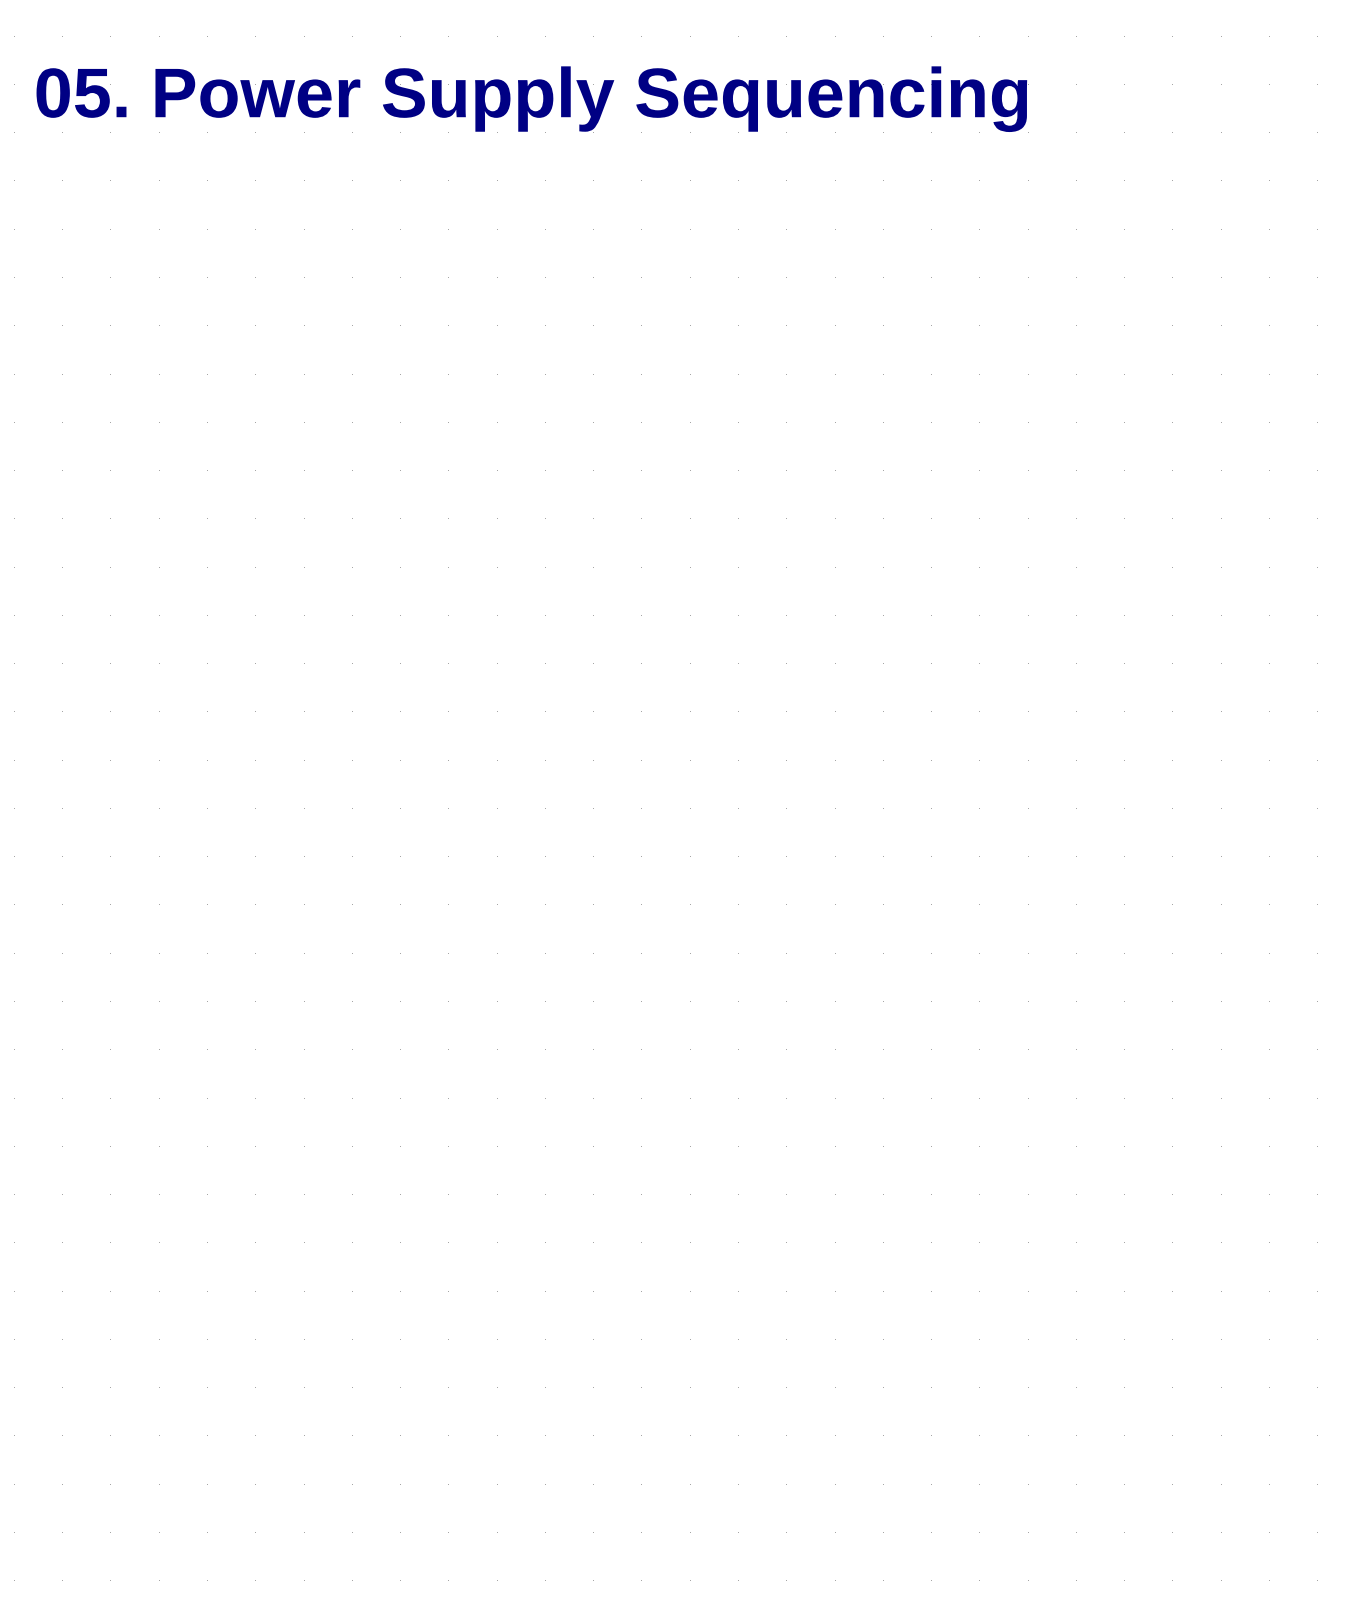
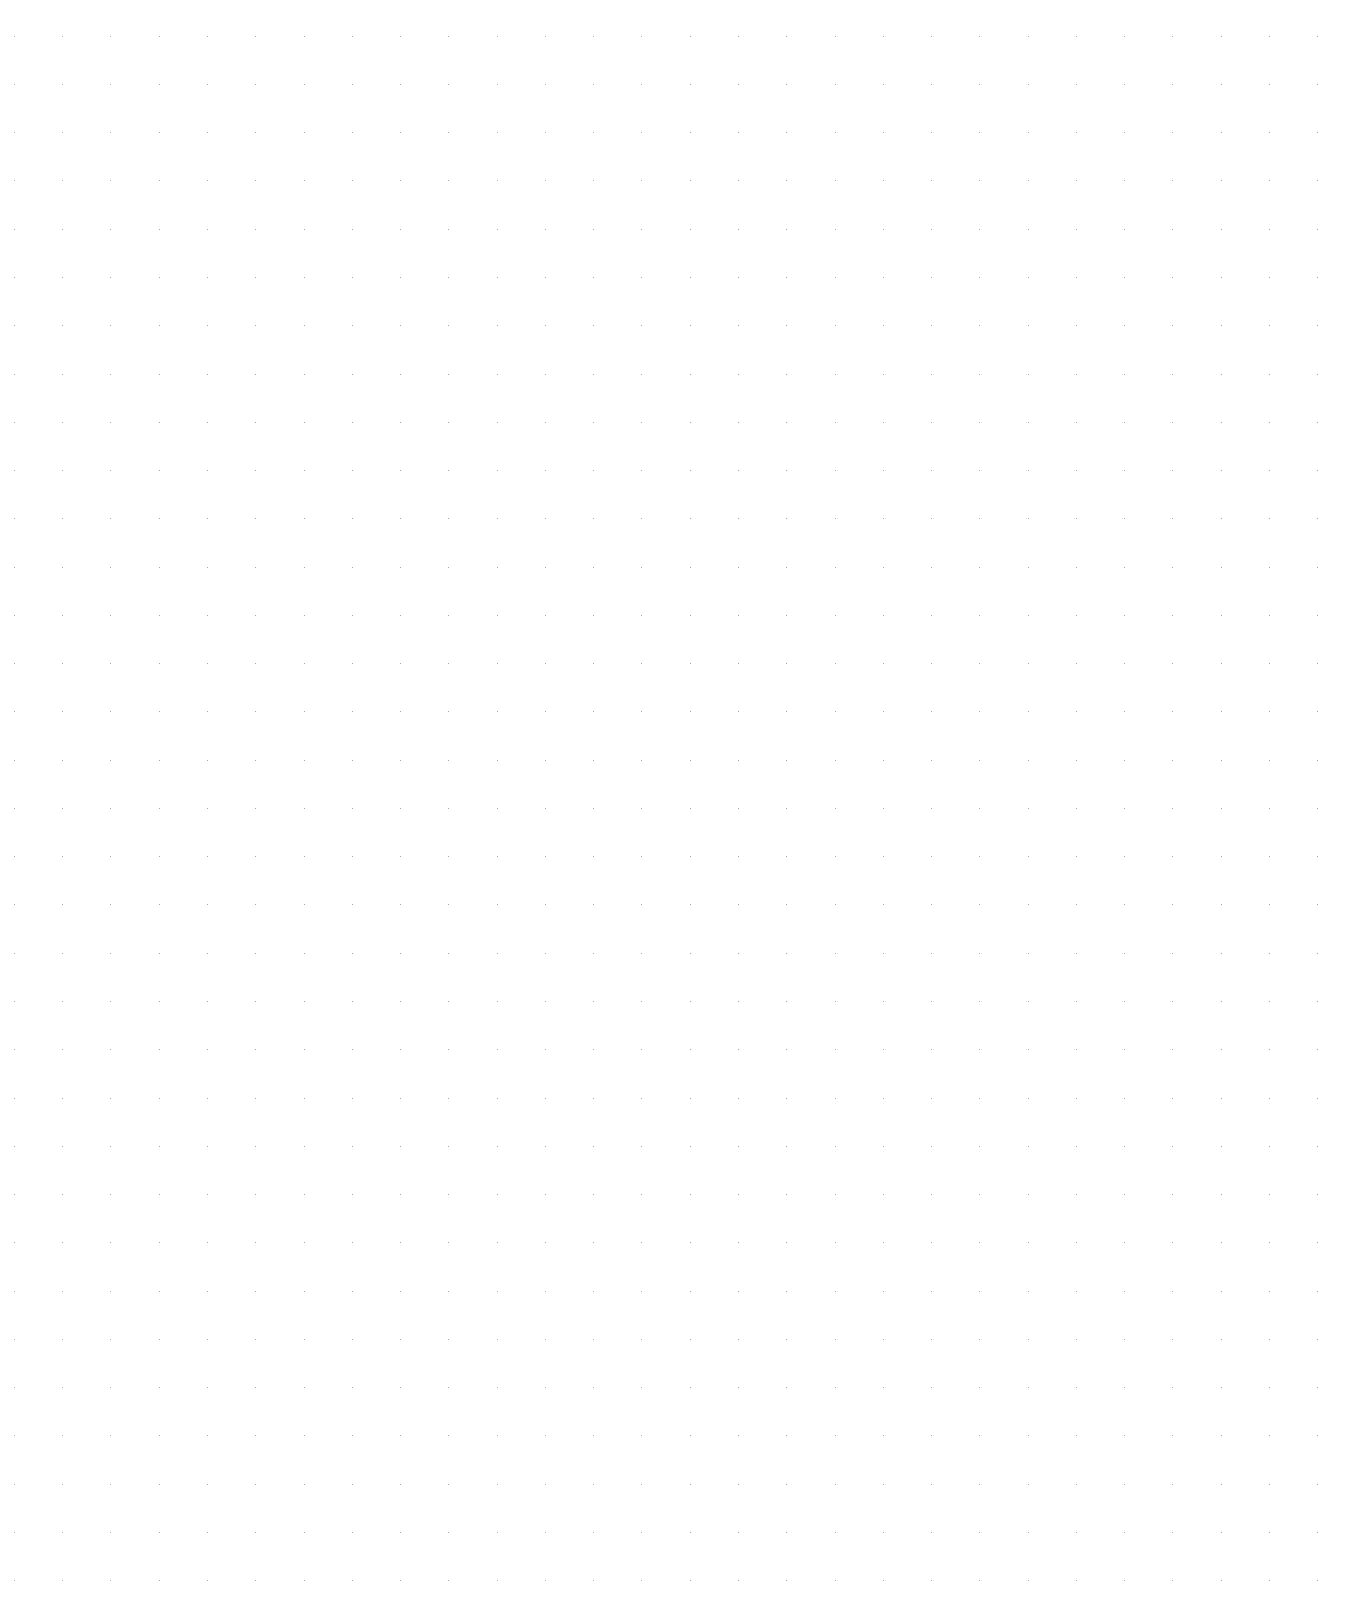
text: 05. Power Supply Sequencing (531, 99) -> none

